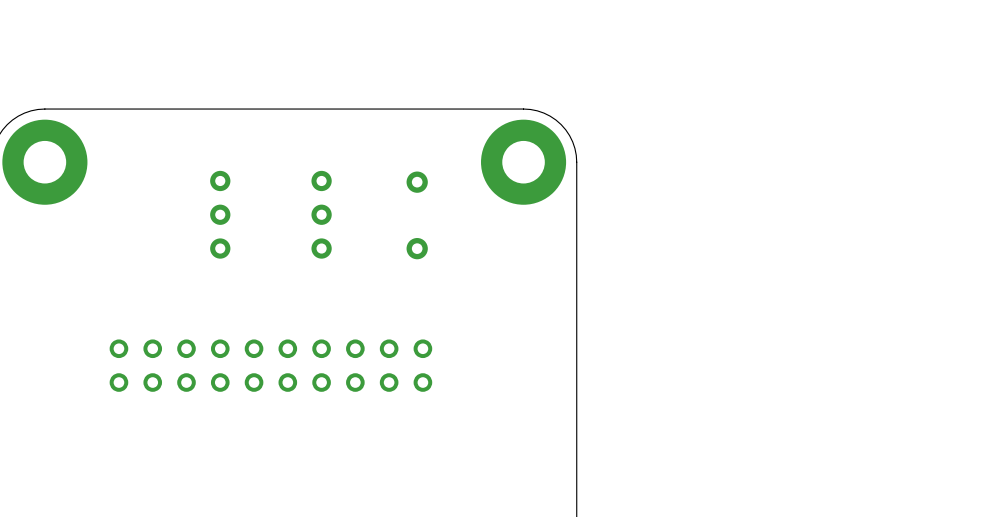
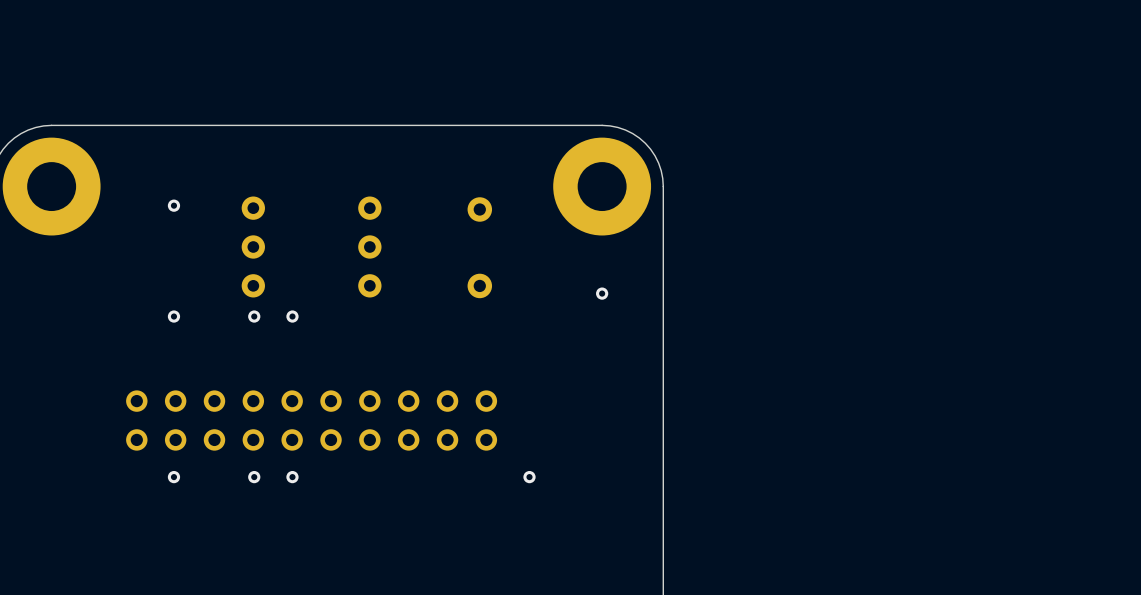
via: none -> (173, 205)
via: none -> (602, 293)
via: none -> (173, 316)
via: none -> (254, 316)
via: none -> (292, 316)
via: none -> (173, 477)
via: none -> (254, 477)
via: none -> (292, 477)
via: none -> (529, 477)

